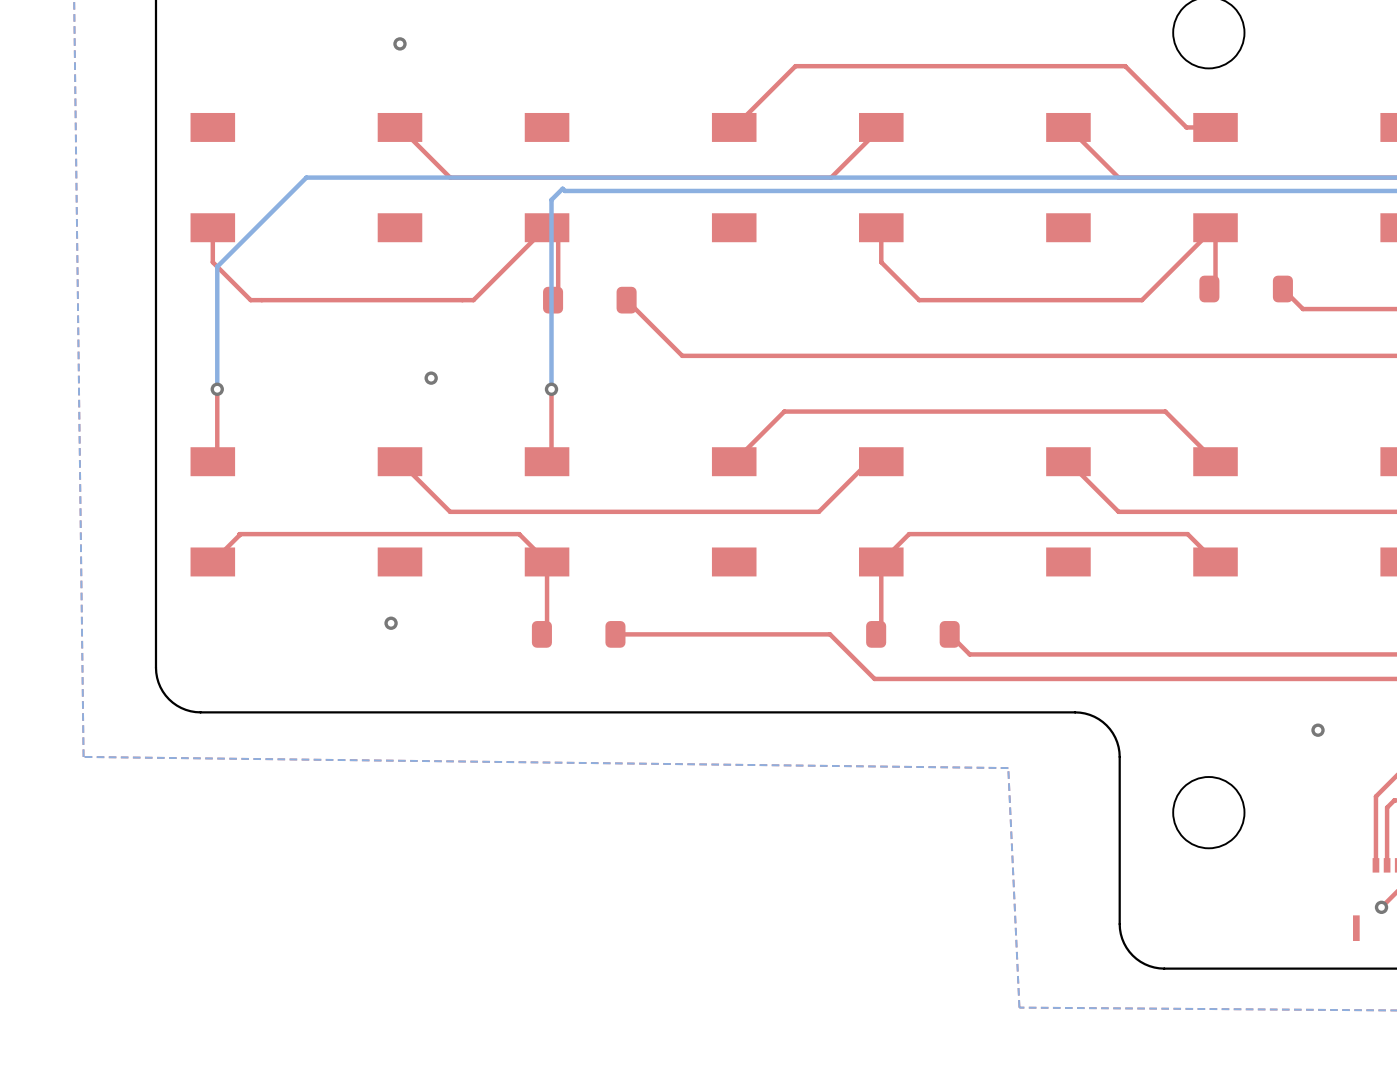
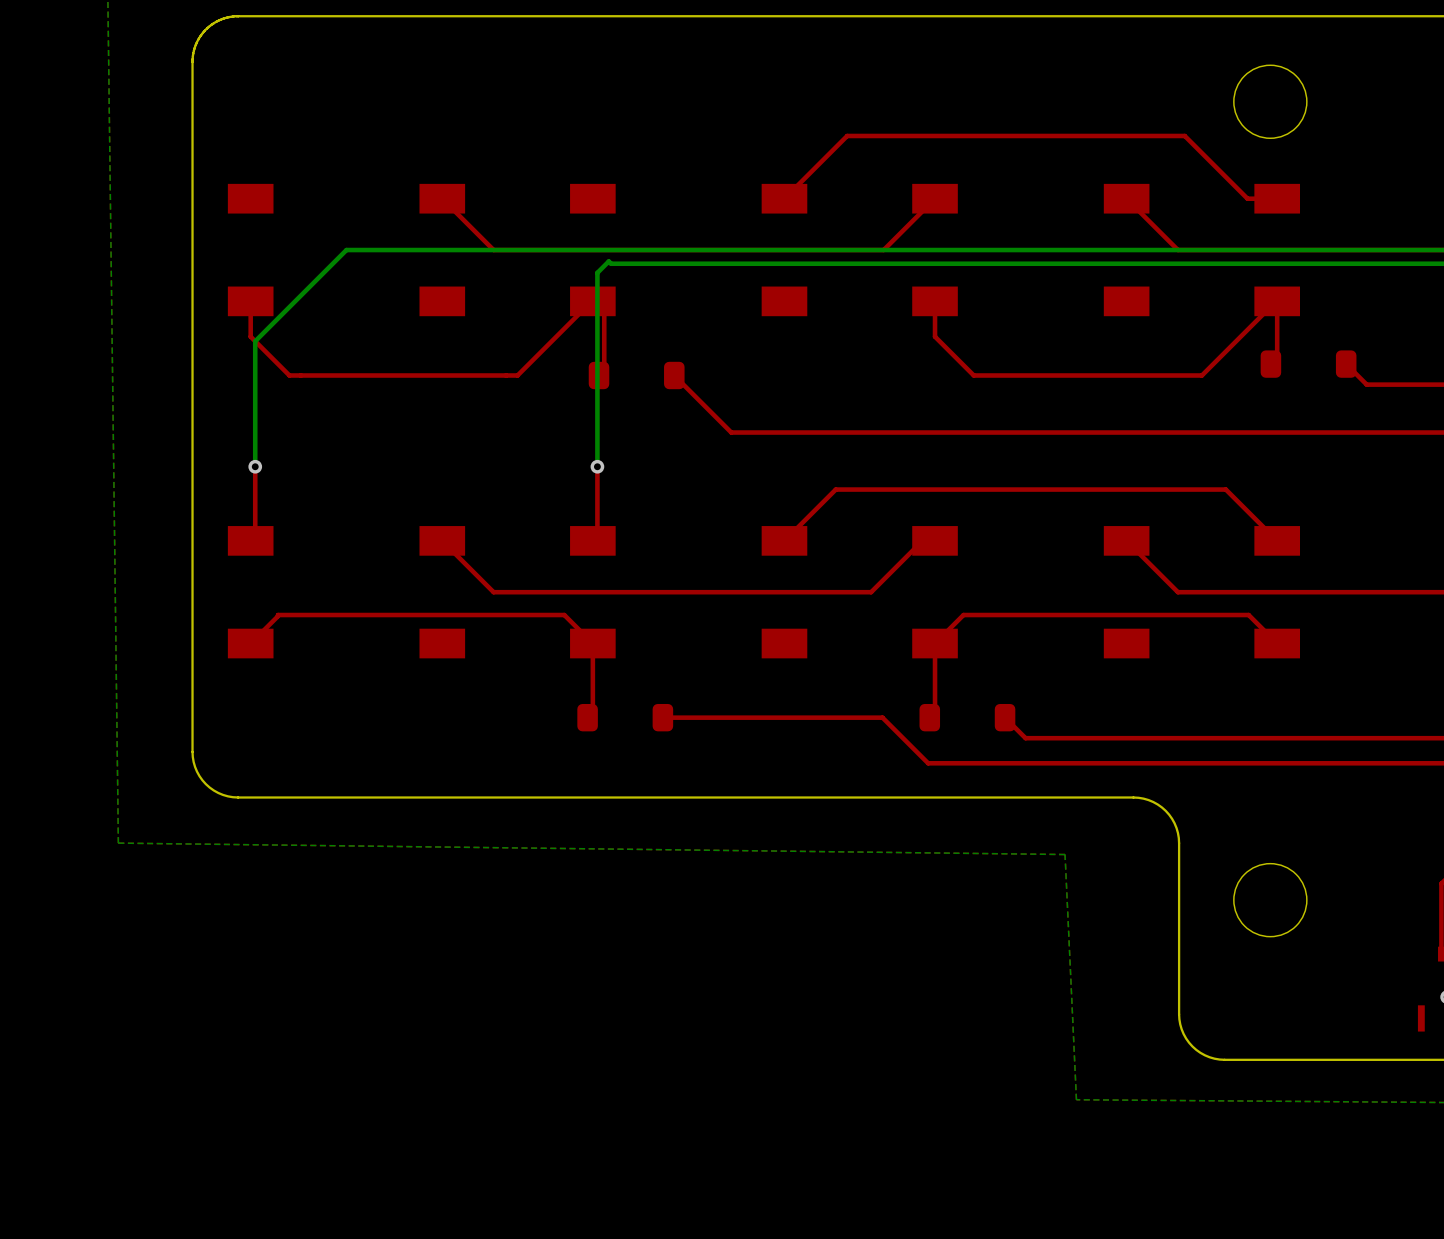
via: (399, 43) -> none
via: (431, 378) -> none
via: (391, 623) -> none
via: (1318, 730) -> none

